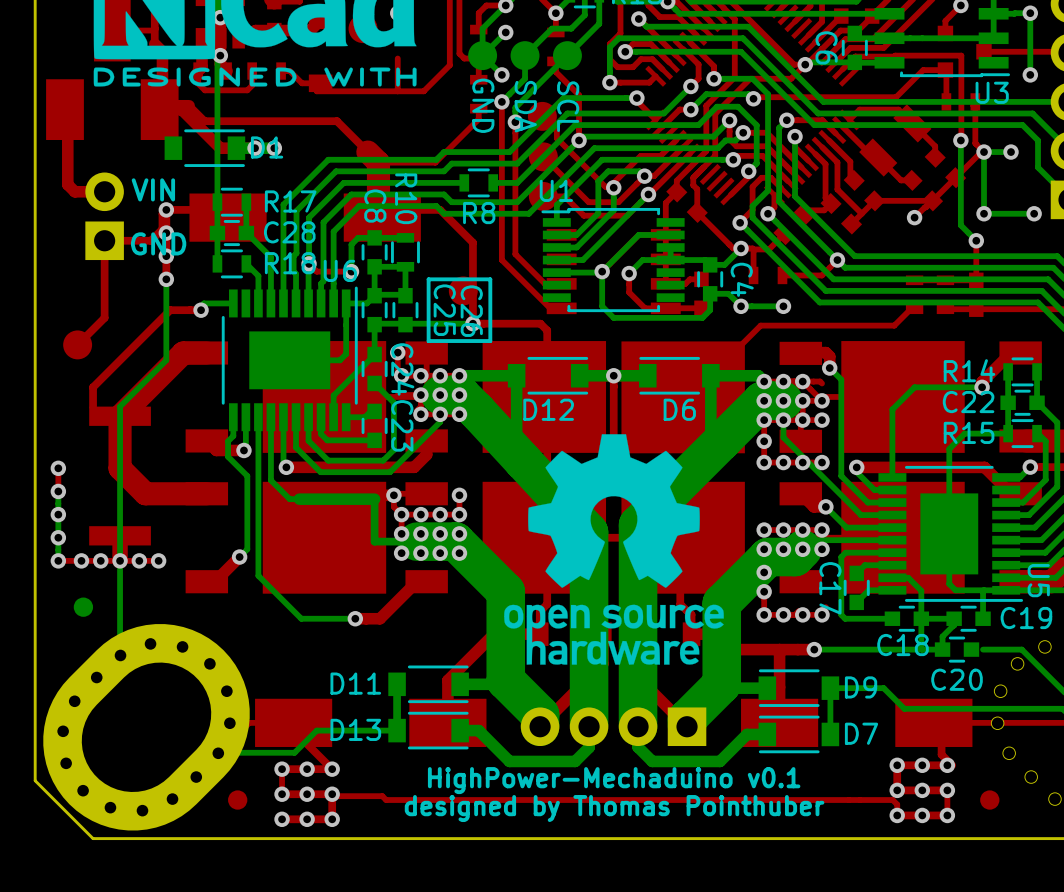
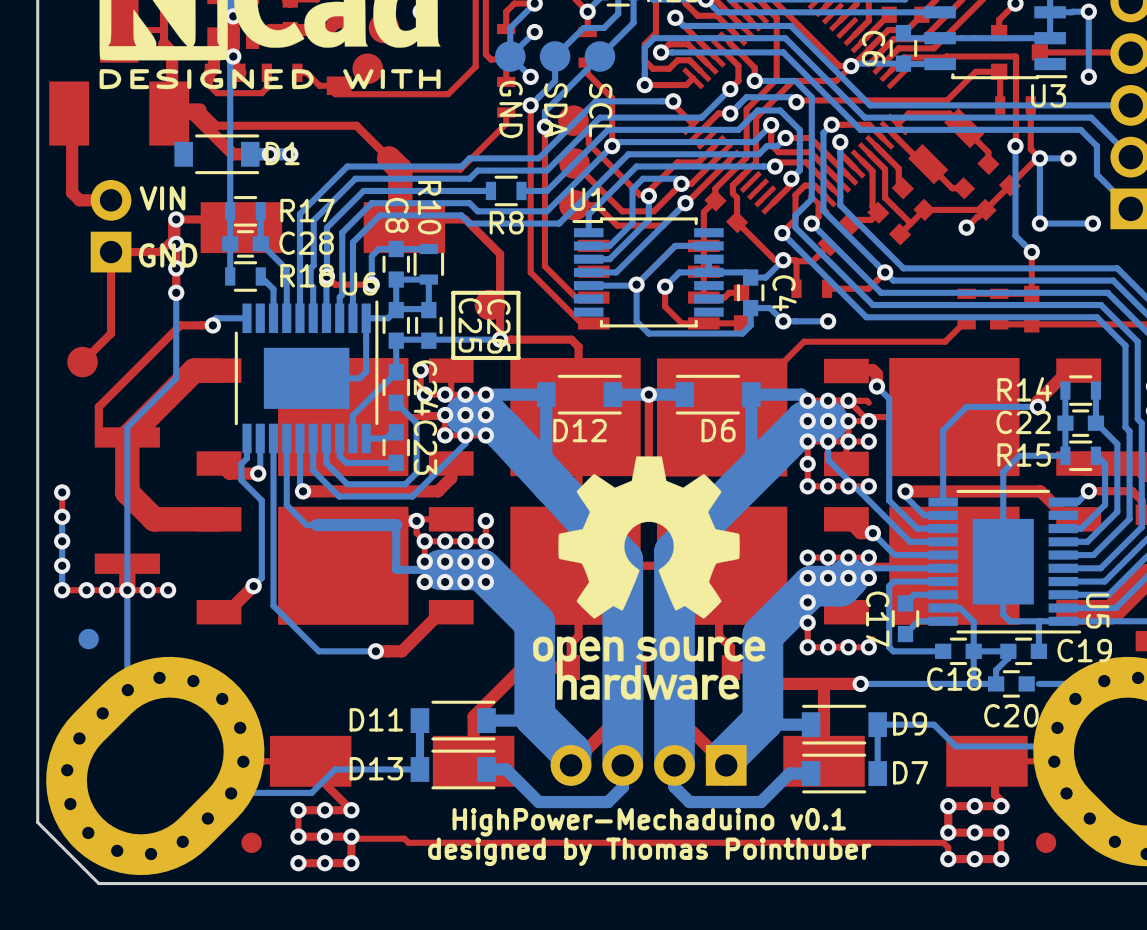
top track: (397, 58) (397, 91) -> none
part: none -> (367, 68)

